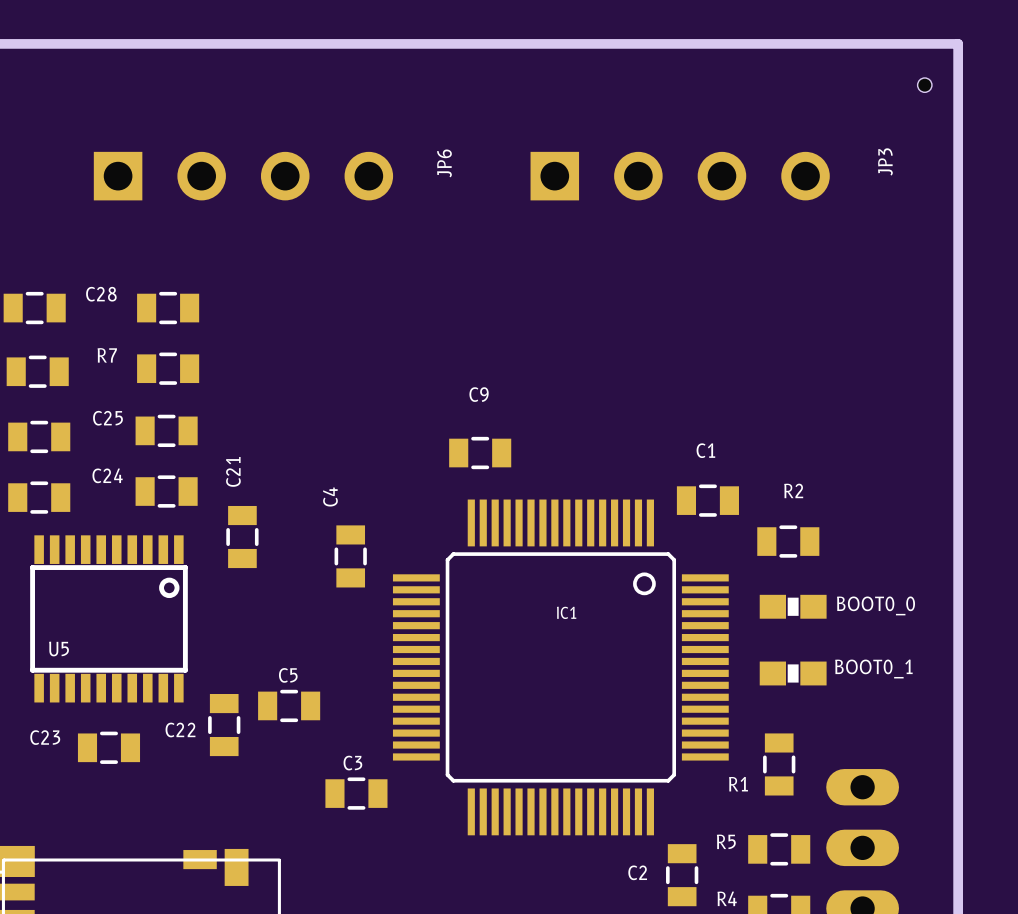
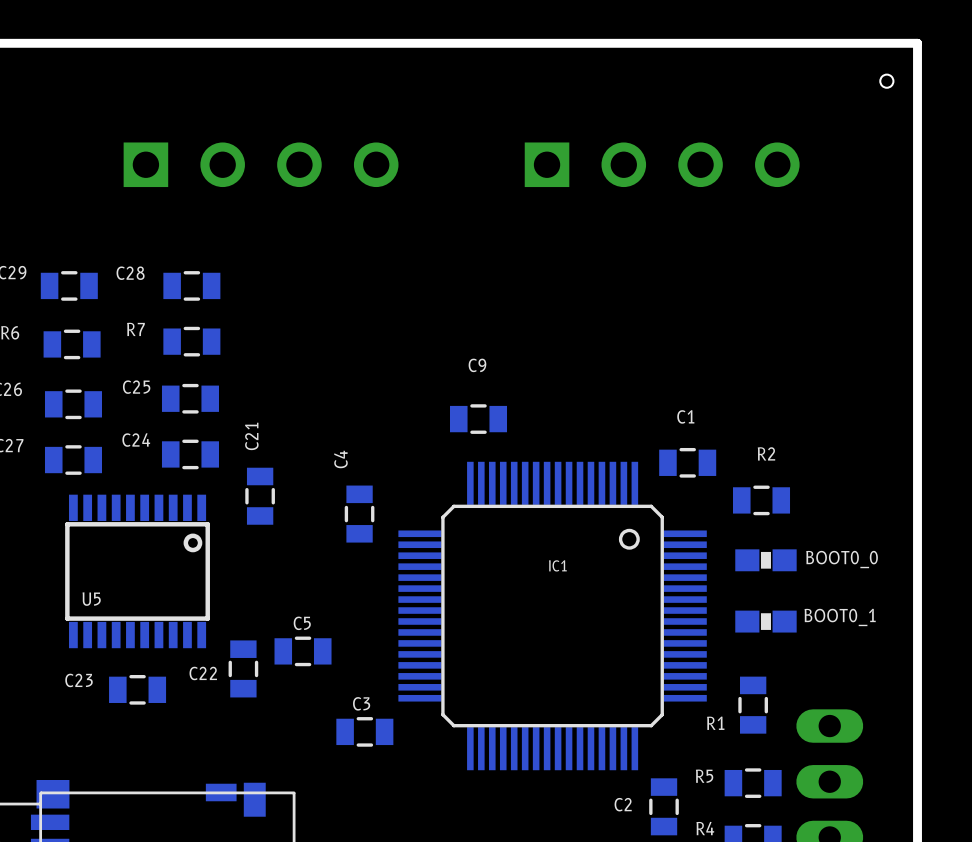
JP3 name: JP3 (885, 161) -> none
JP6 name: JP6 (444, 163) -> none
IC1 footprint: [392, 499, 729, 836] -> [398, 461, 707, 771]

